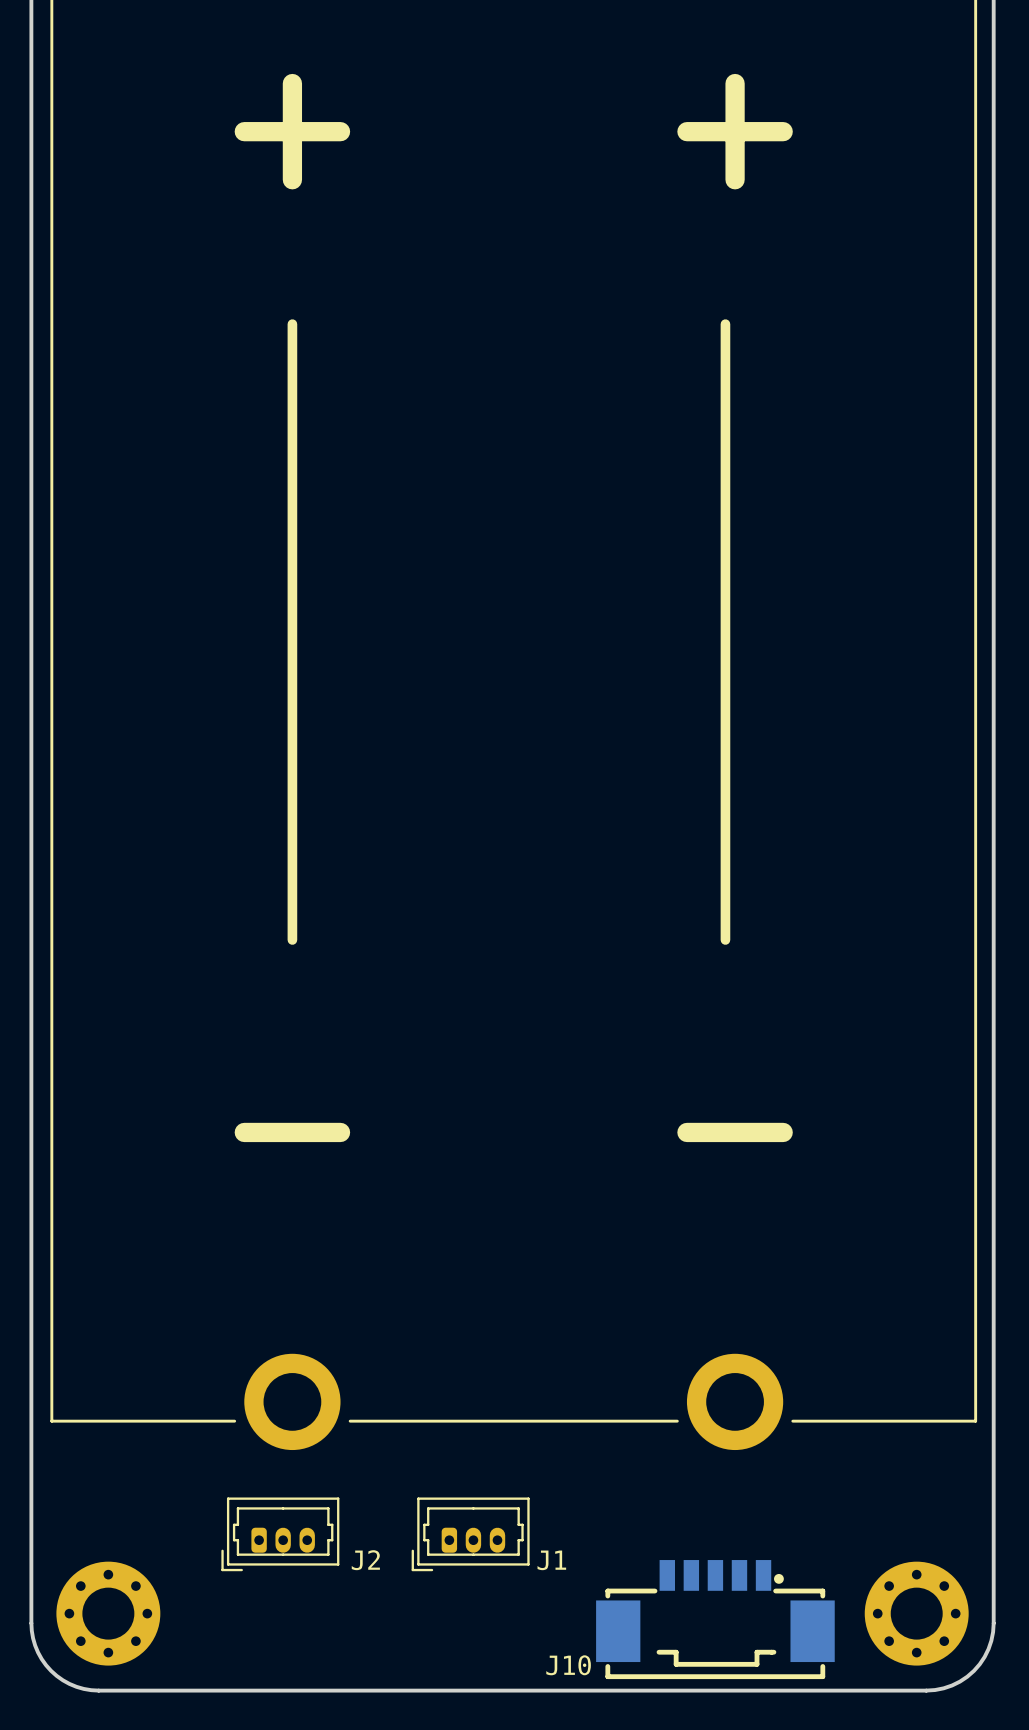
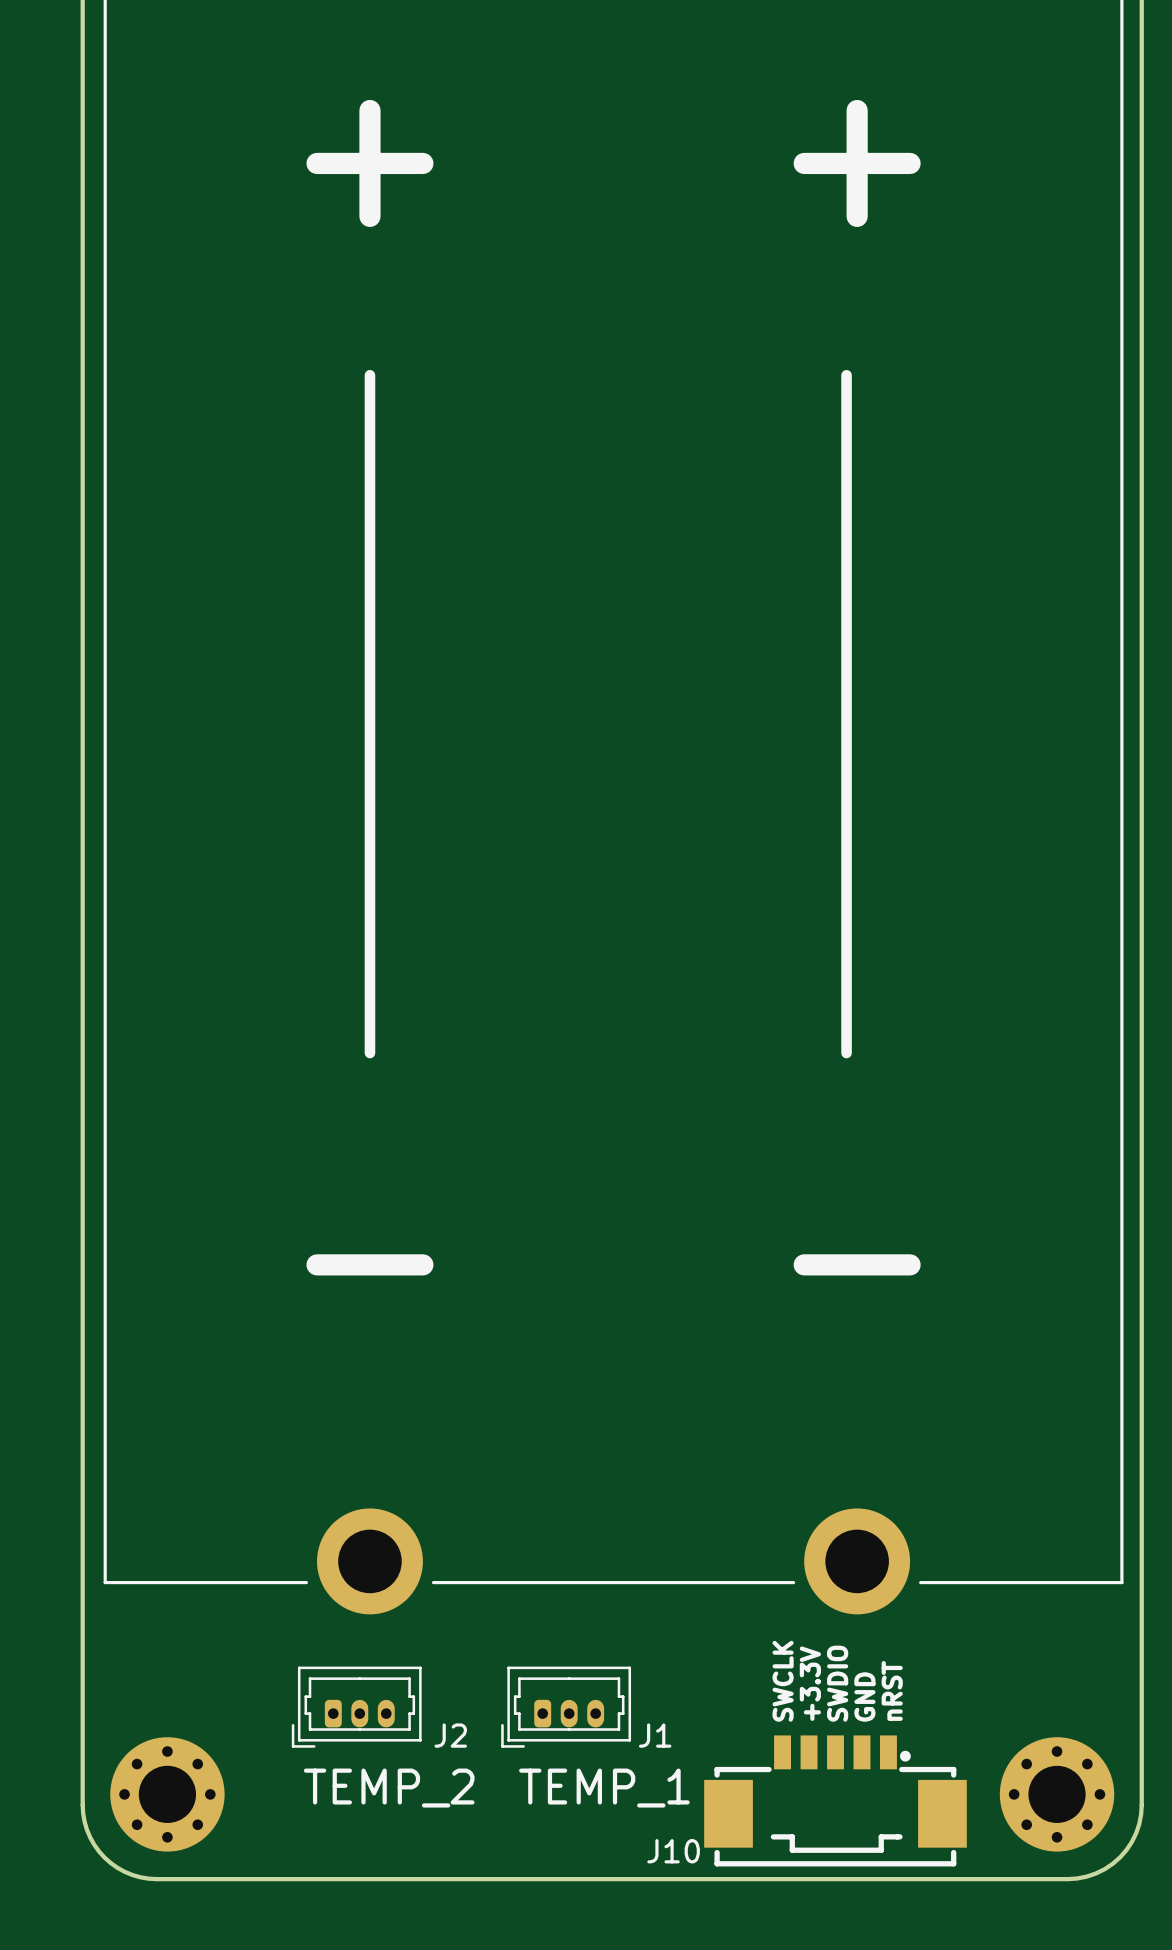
text: none -> SWCLK (783, 1681)
text: none -> +3.3V (810, 1683)
text: none -> SWDIO (837, 1683)
text: none -> nRST (892, 1690)
text: none -> GND (864, 1697)
text: none -> TEMP_2 (389, 1788)
text: none -> TEMP_1 (604, 1788)

